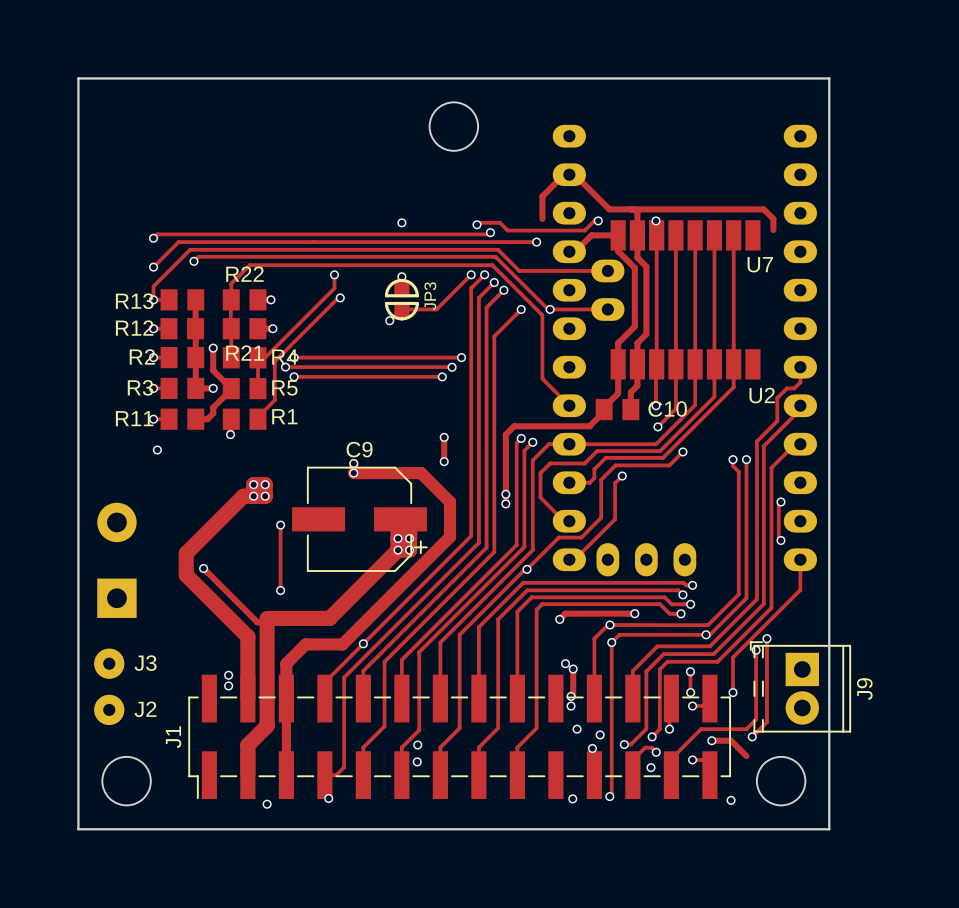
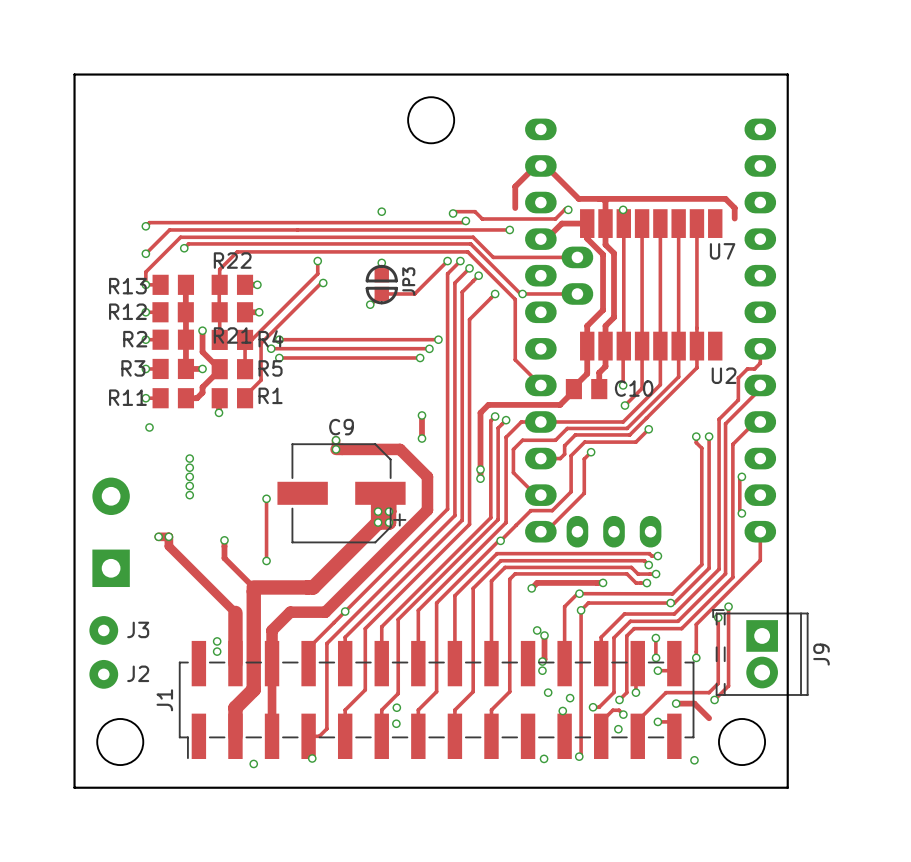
via: none -> (189, 458)
via: (253, 484) -> none
via: (265, 484) -> none
via: none -> (189, 467)
track: (253, 496) (253, 484) (265, 484) (265, 496) (243, 496) (186, 553) (186, 575) (247, 636) (247, 645) -> (158, 536) (168, 536) (168, 546) (235, 612)
via: (253, 496) -> none
via: (265, 496) -> none
via: none -> (189, 476)
via: none -> (189, 485)
via: none -> (189, 495)
via: none -> (158, 536)
via: none -> (168, 536)
track: (203, 568) (257, 622) (267, 622) -> none
via: (203, 568) -> none
track: none -> (224, 540) (224, 558) (253, 587)
via: none -> (224, 540)

